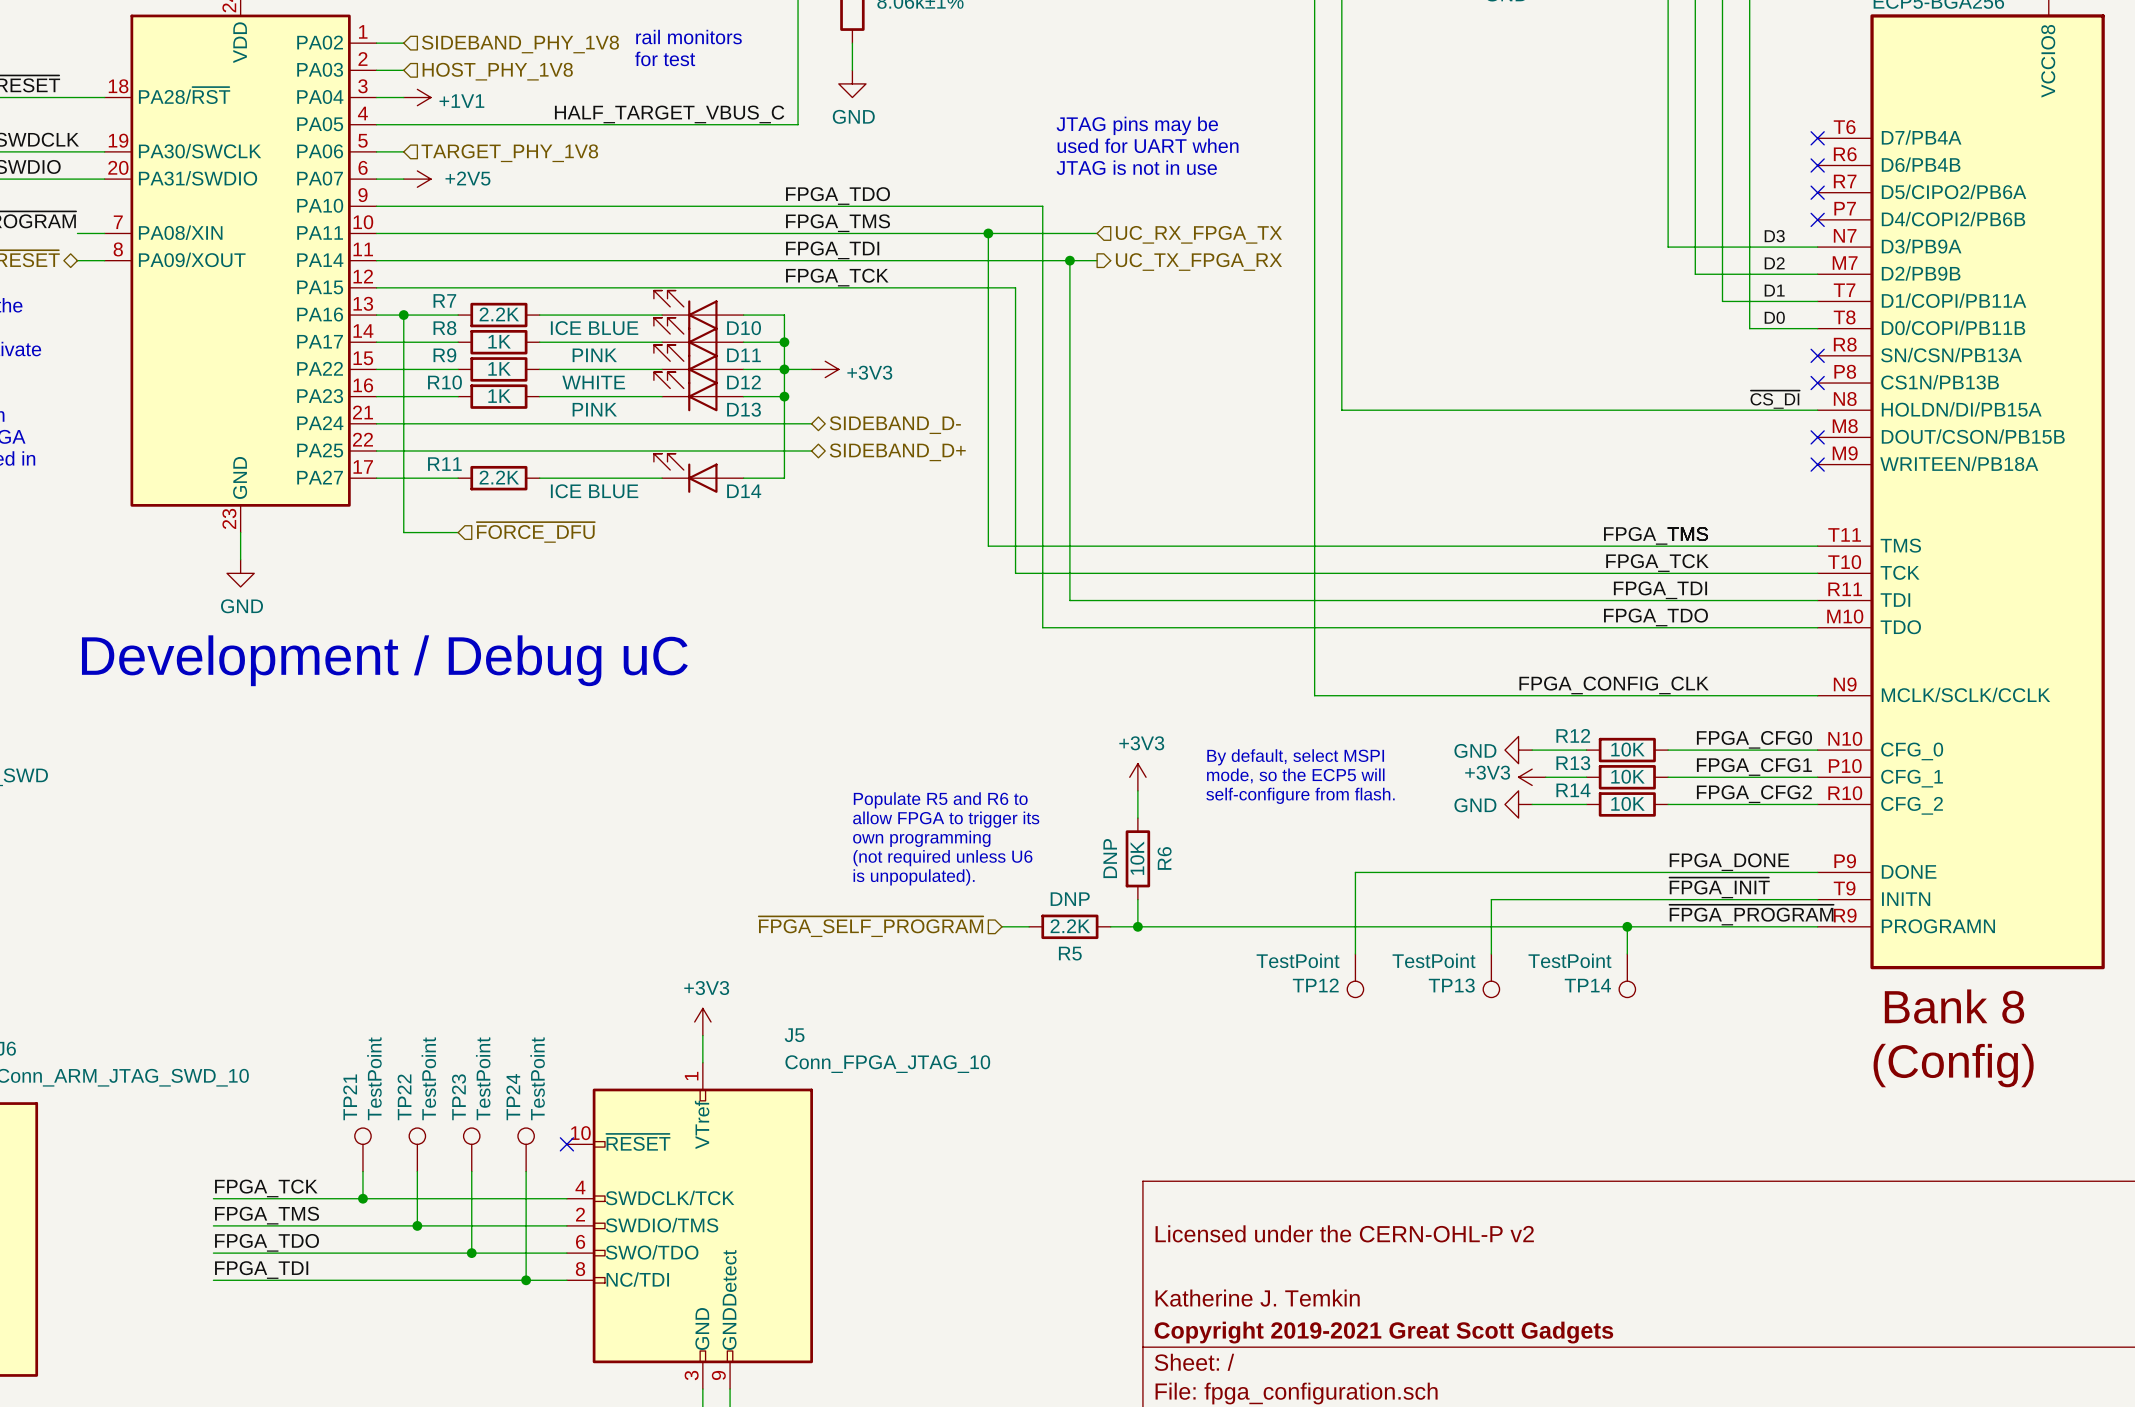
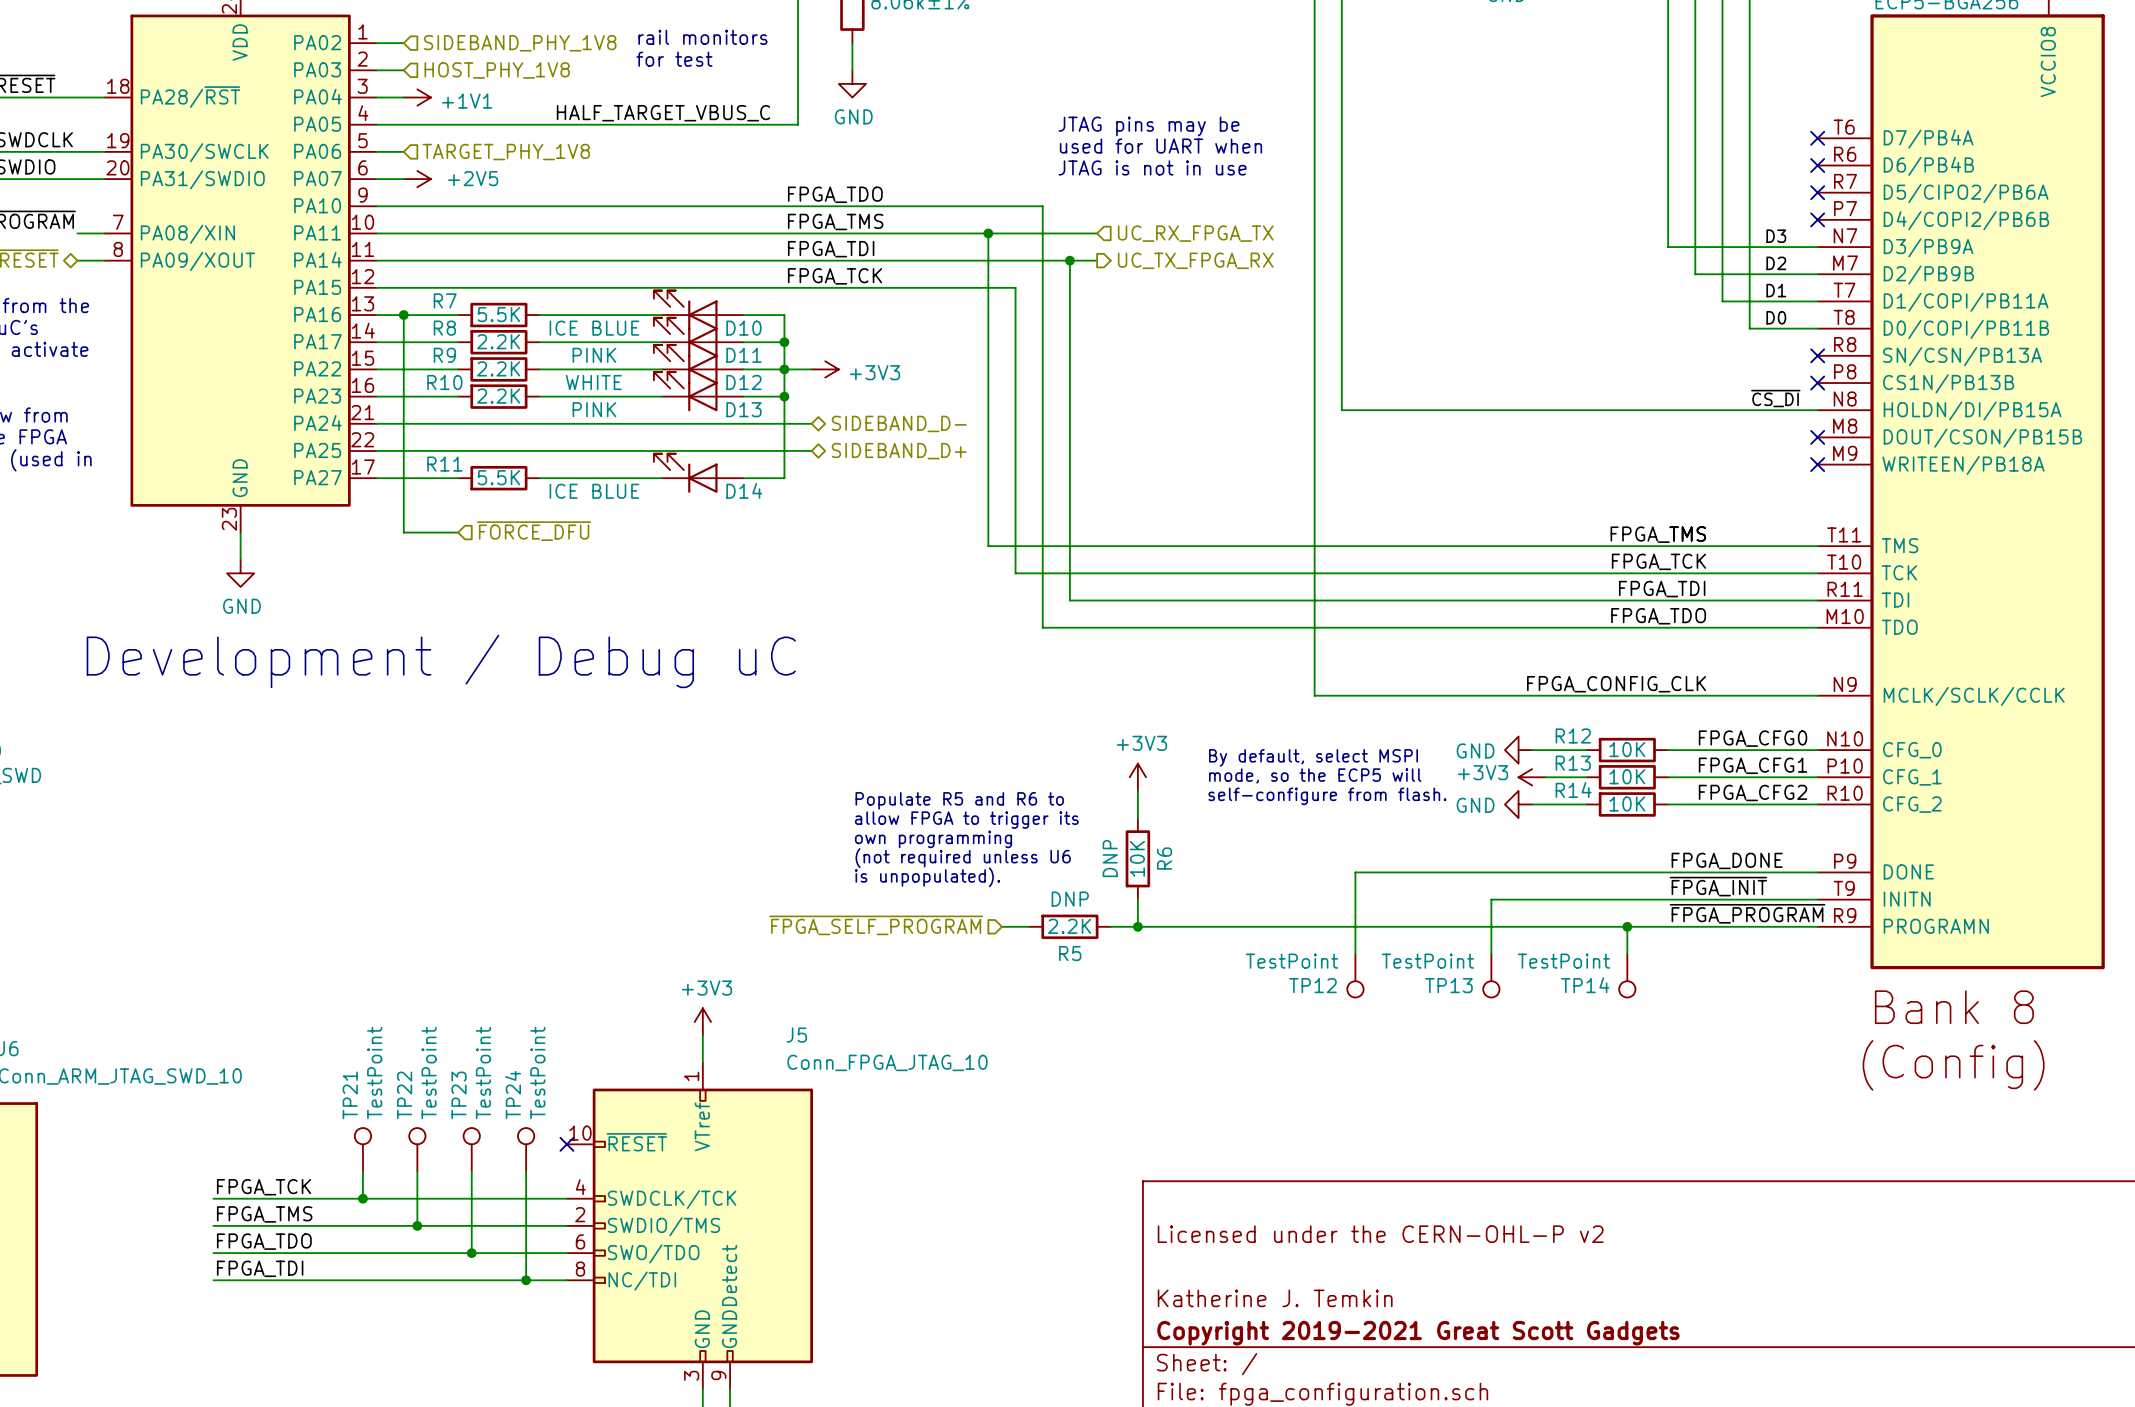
R7 value: 2.2K (499, 314) -> 5.5K (498, 314)
R8 value: 1K (499, 341) -> 2.2K (498, 341)
R9 value: 1K (499, 368) -> 2.2K (498, 368)
R10 value: 1K (499, 396) -> 2.2K (498, 396)
R11 value: 2.2K (499, 477) -> 5.5K (498, 477)

